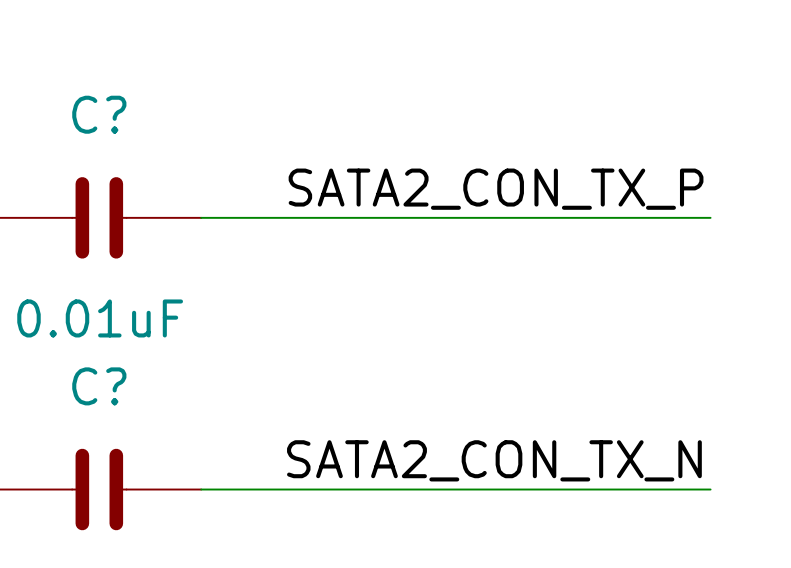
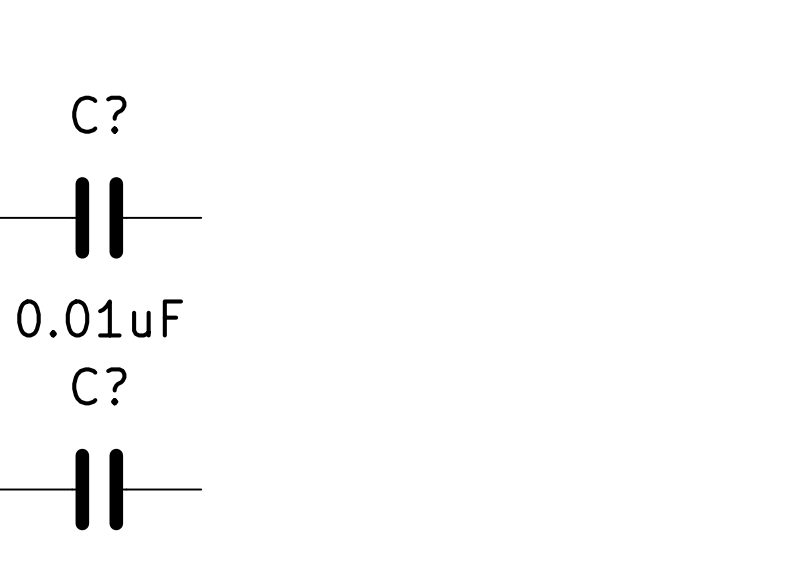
label: SATA2_CON_TX_P (496, 189) -> none
wire: (201, 217) (710, 217) -> none
label: SATA2_CON_TX_N (494, 460) -> none
wire: (201, 489) (710, 489) -> none

